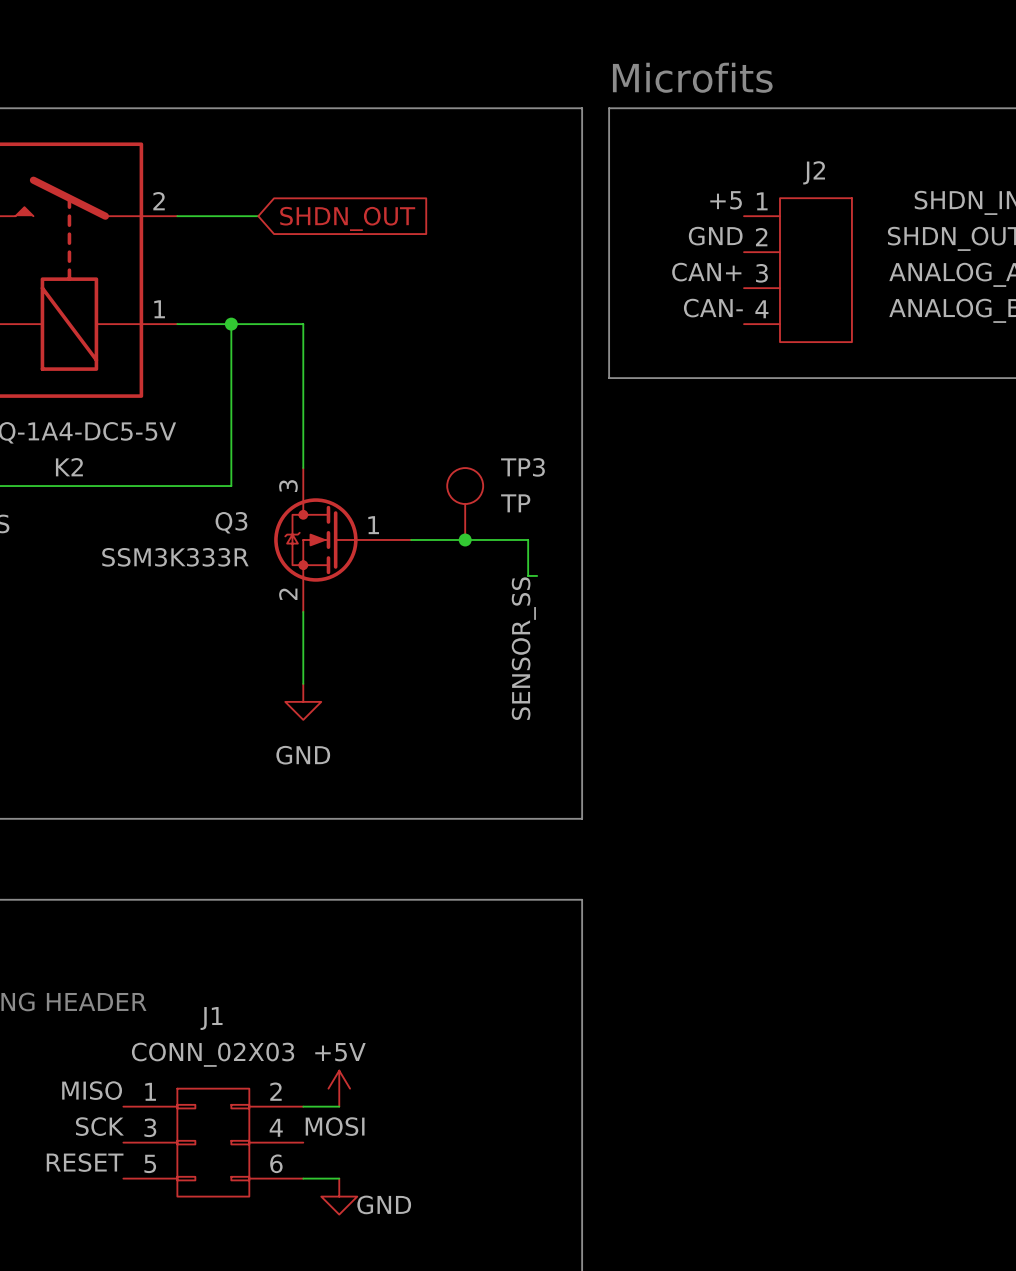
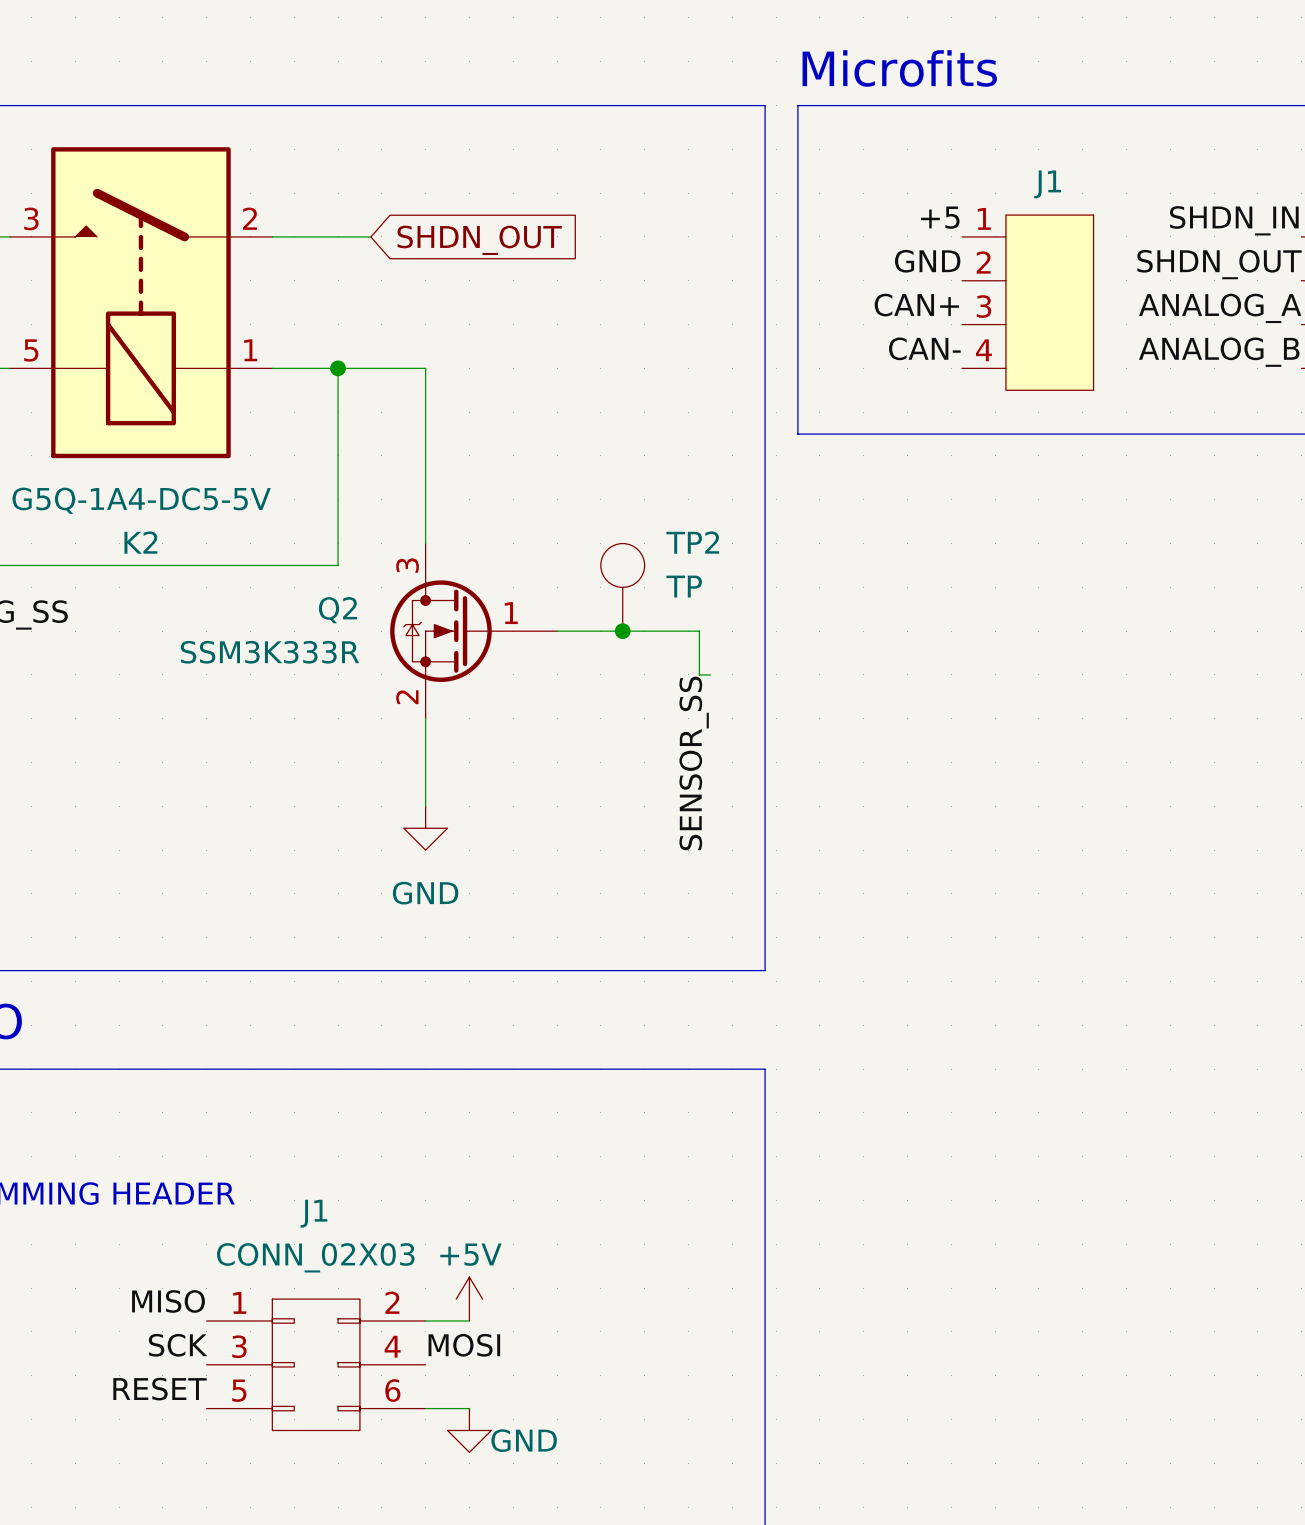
J2 name: J2 (814, 172) -> J1 (1047, 184)
TP3 name: TP3 (522, 467) -> TP2 (692, 542)
Q3 name: Q3 (231, 522) -> Q2 (337, 610)

